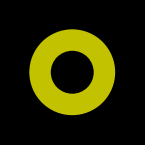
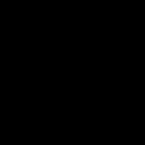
part: (72, 72) -> none

